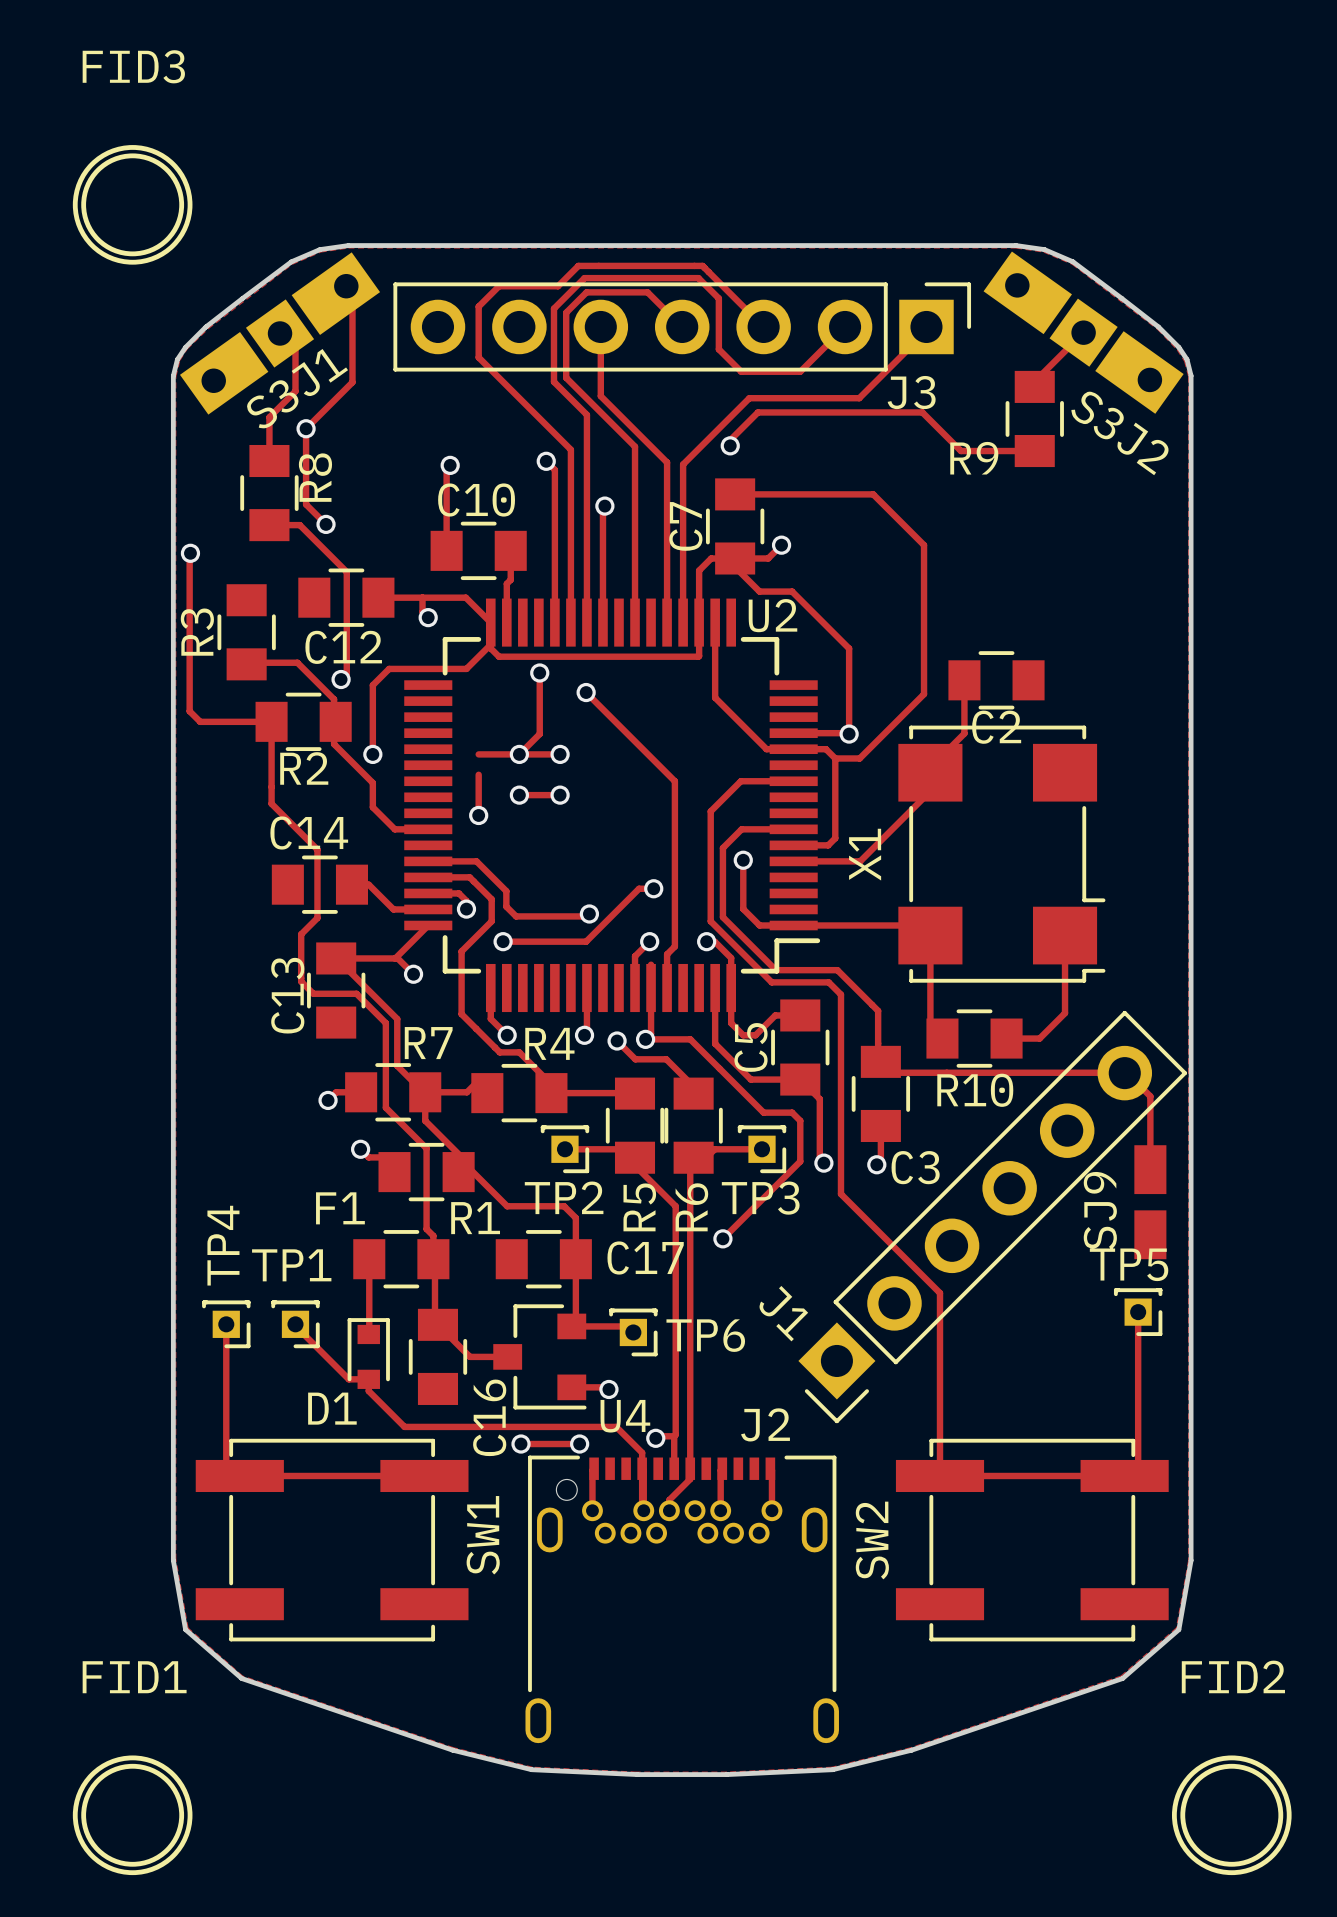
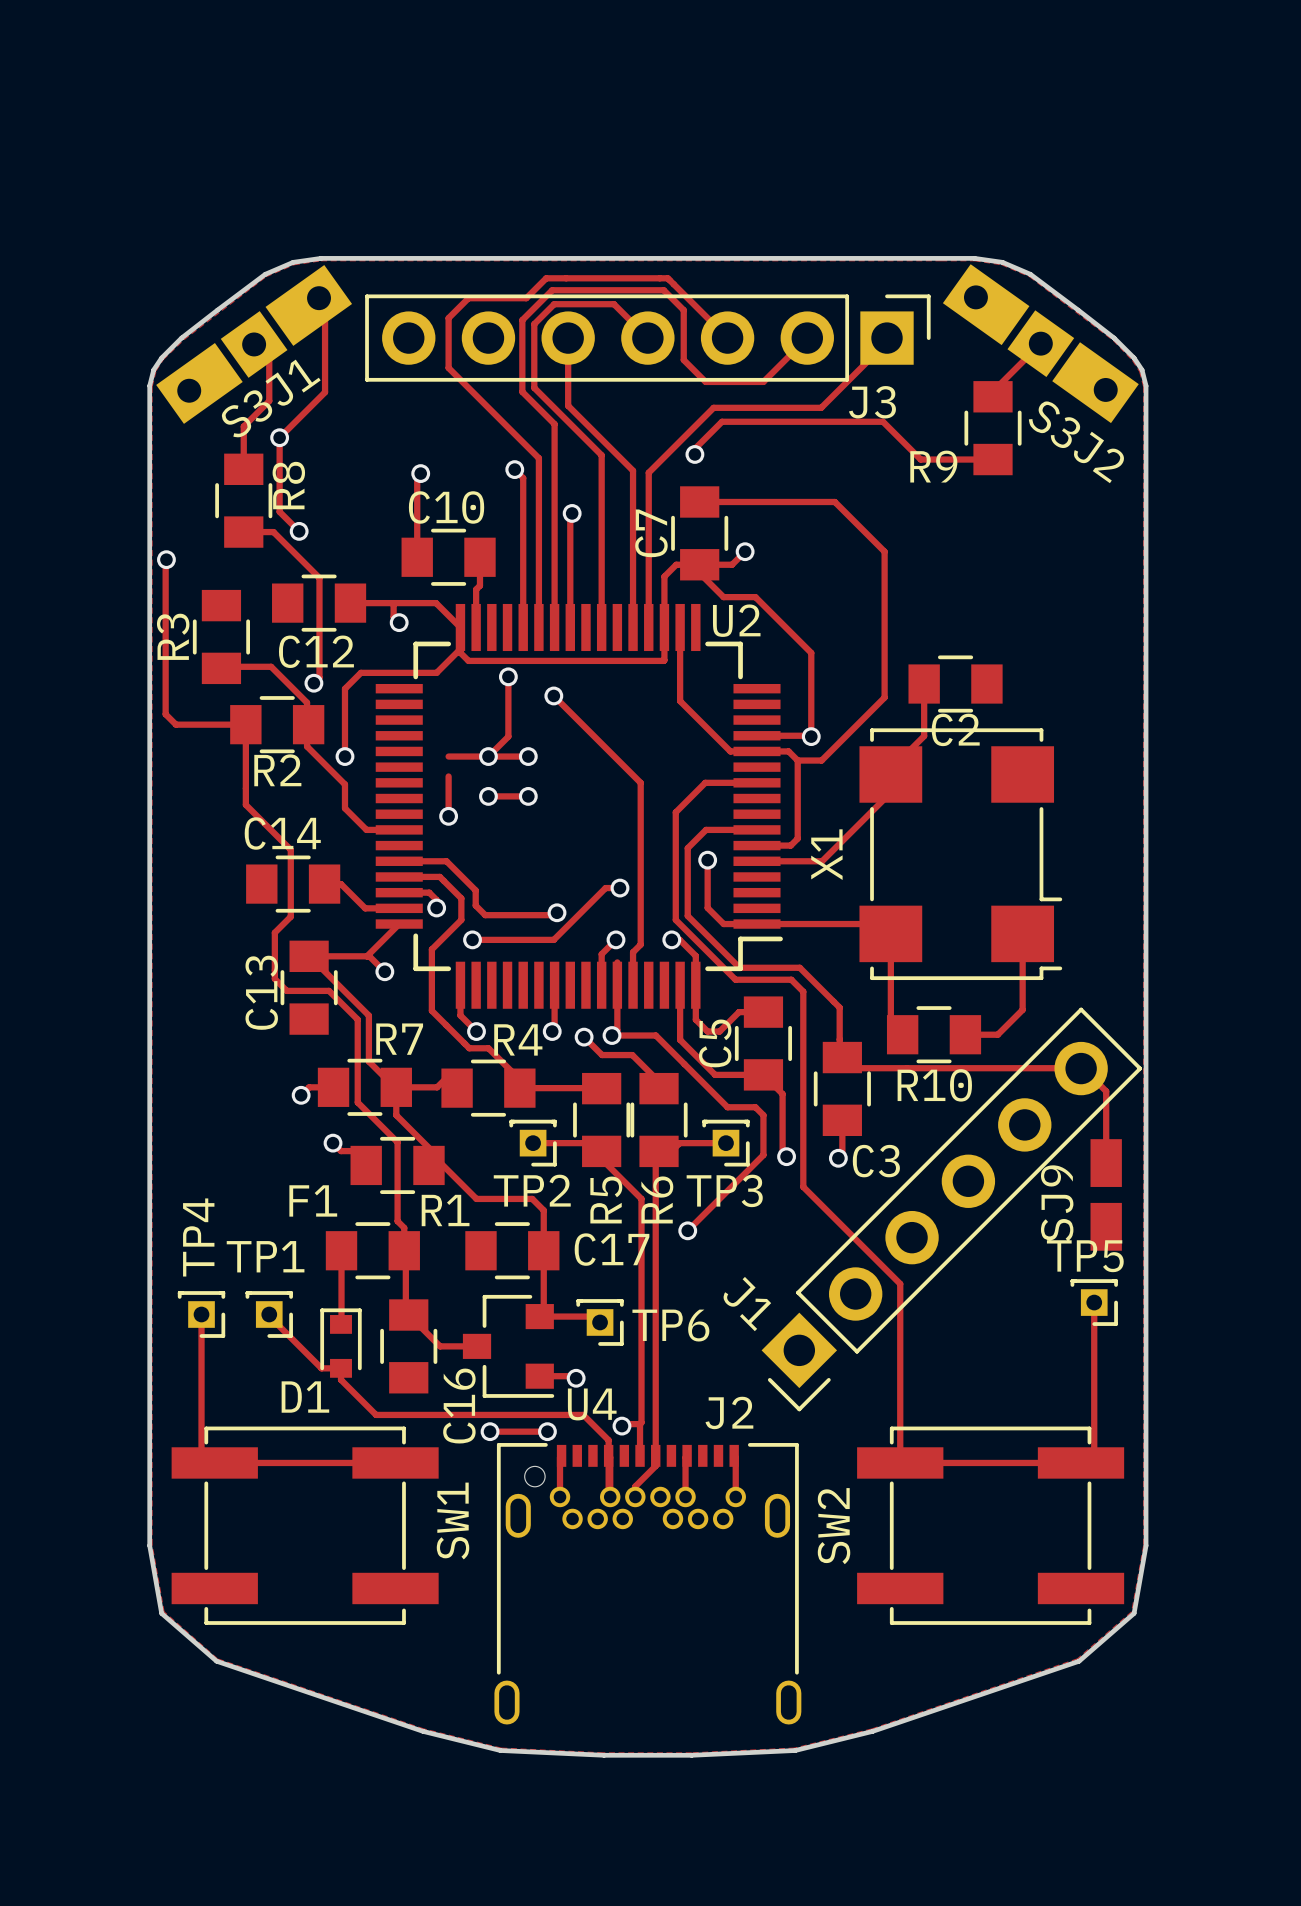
FID3: (132, 204) -> none
FID1: (132, 1815) -> none
FID2: (1231, 1815) -> none

